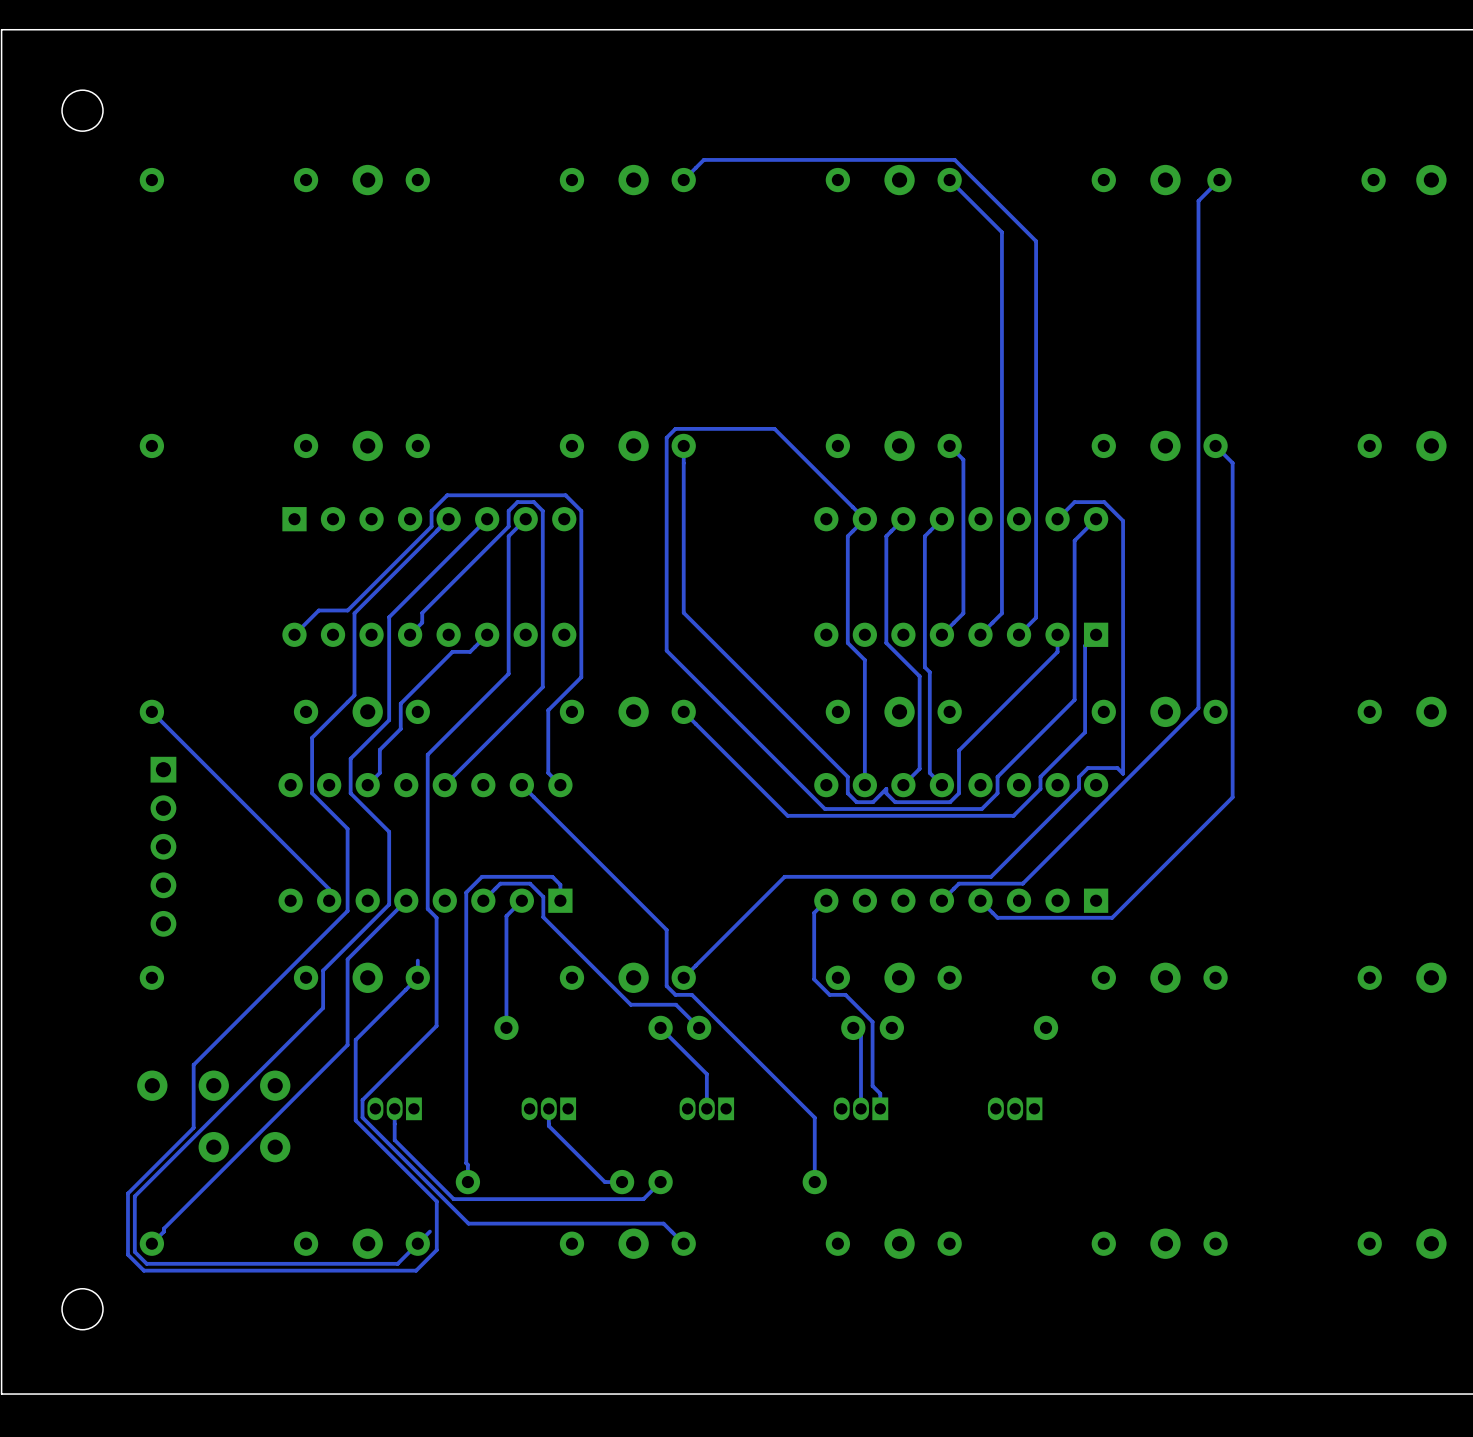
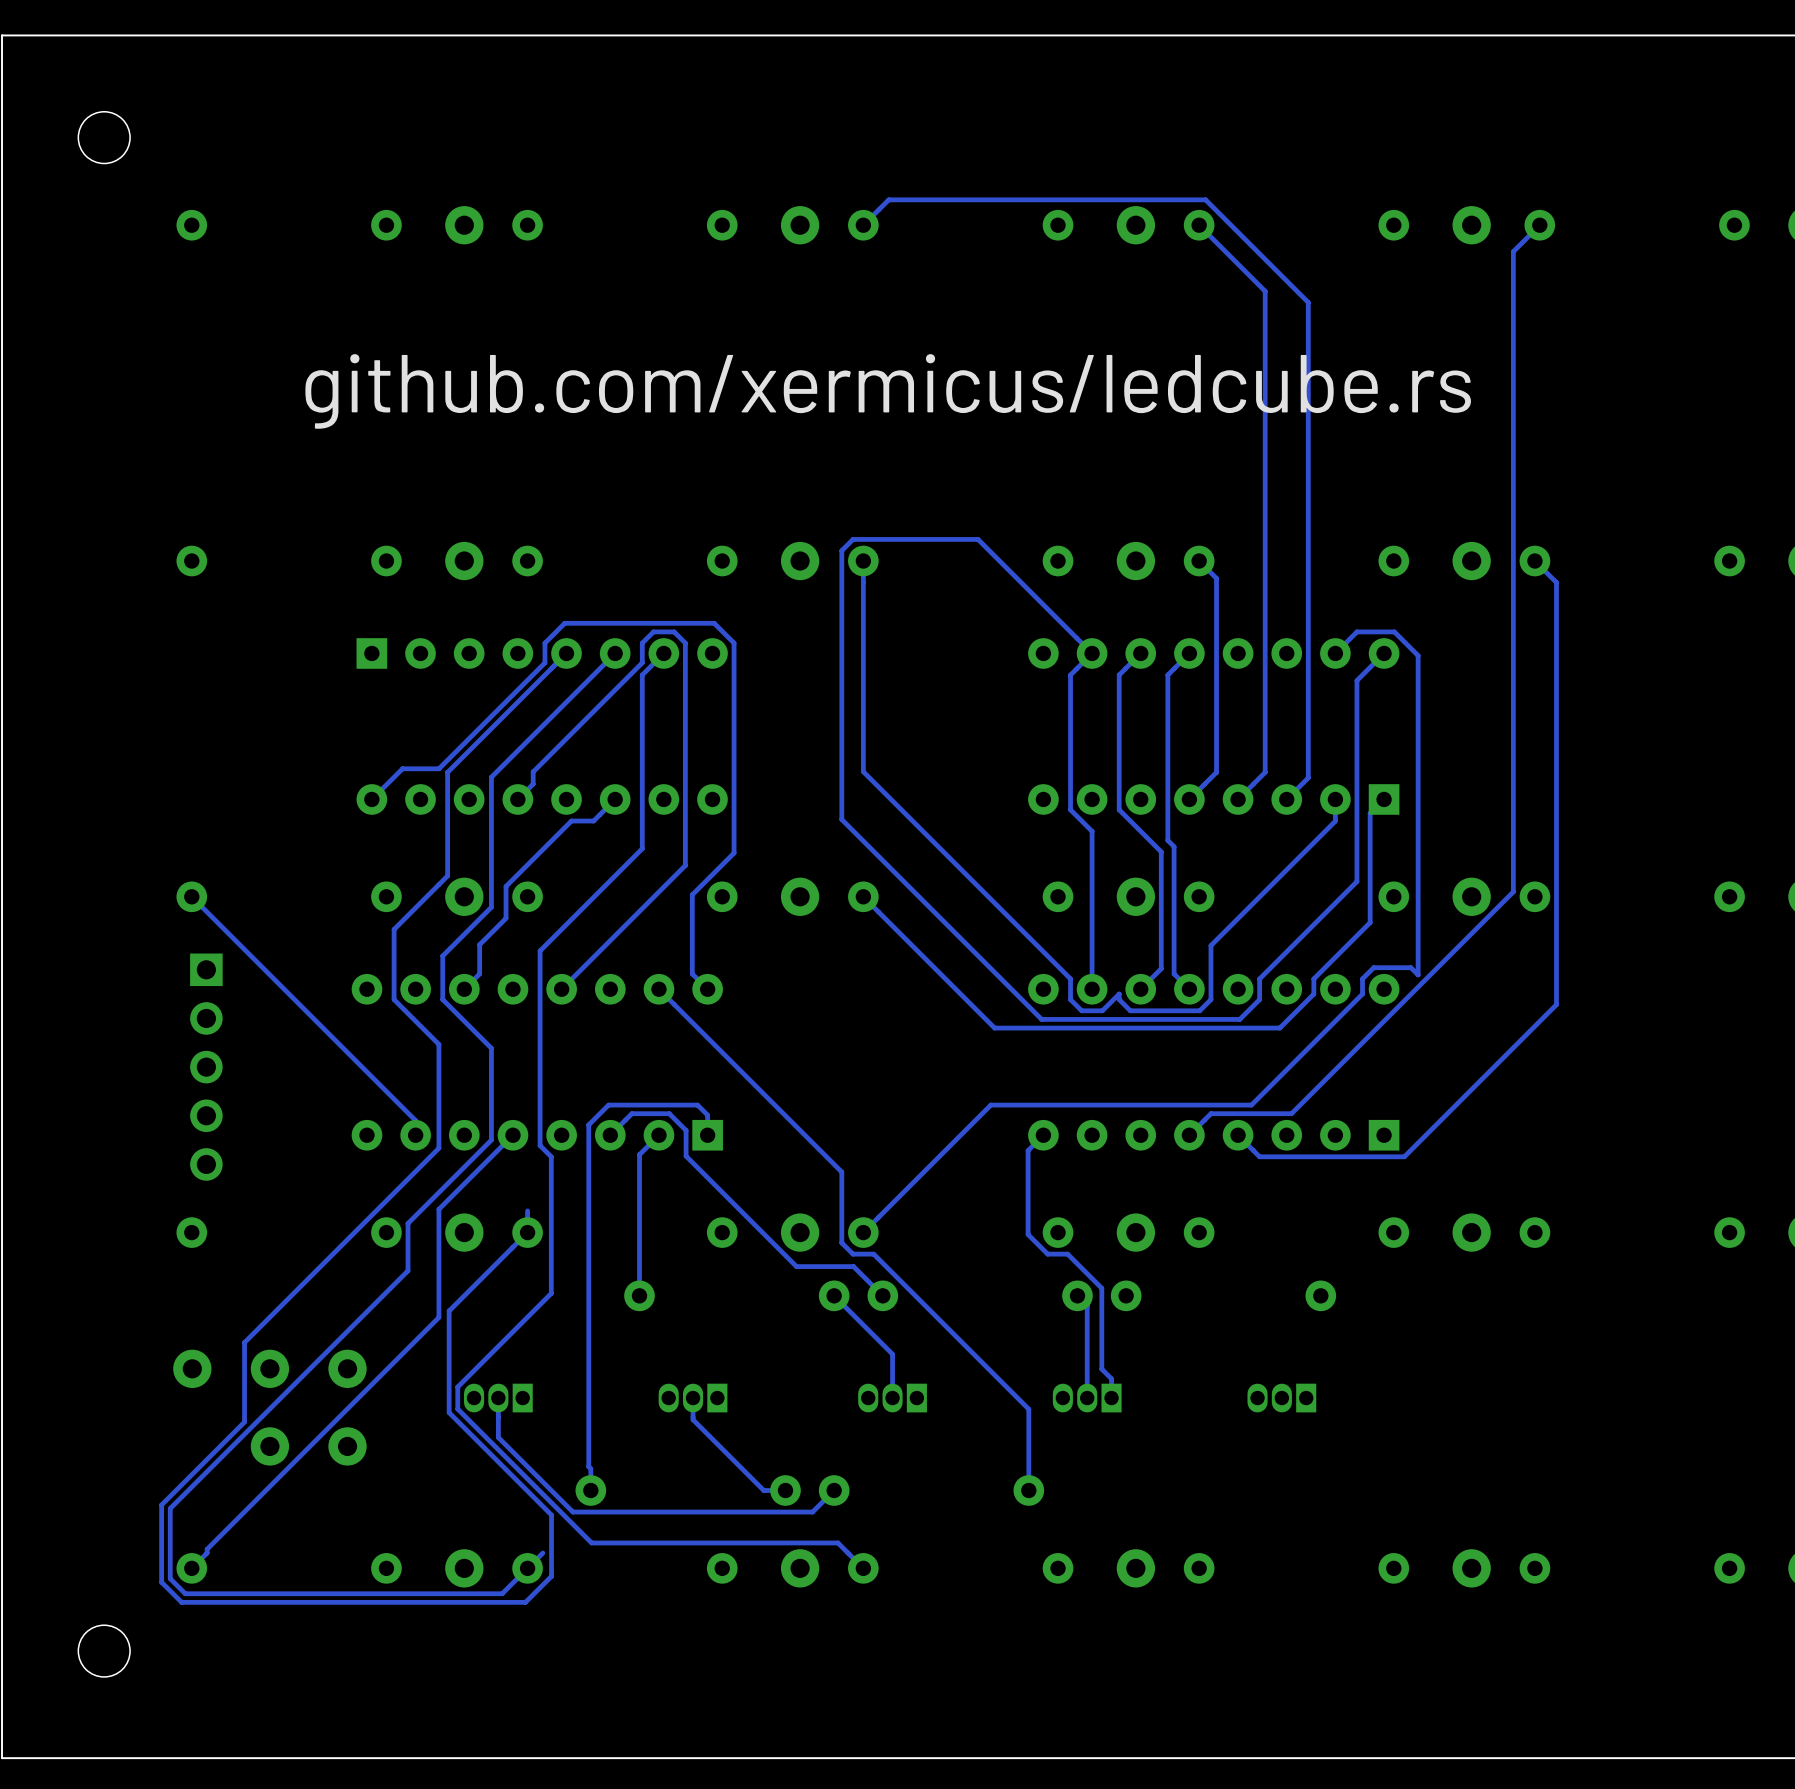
text: none -> github.com/xermicus/ledcube.rs (888, 391)

